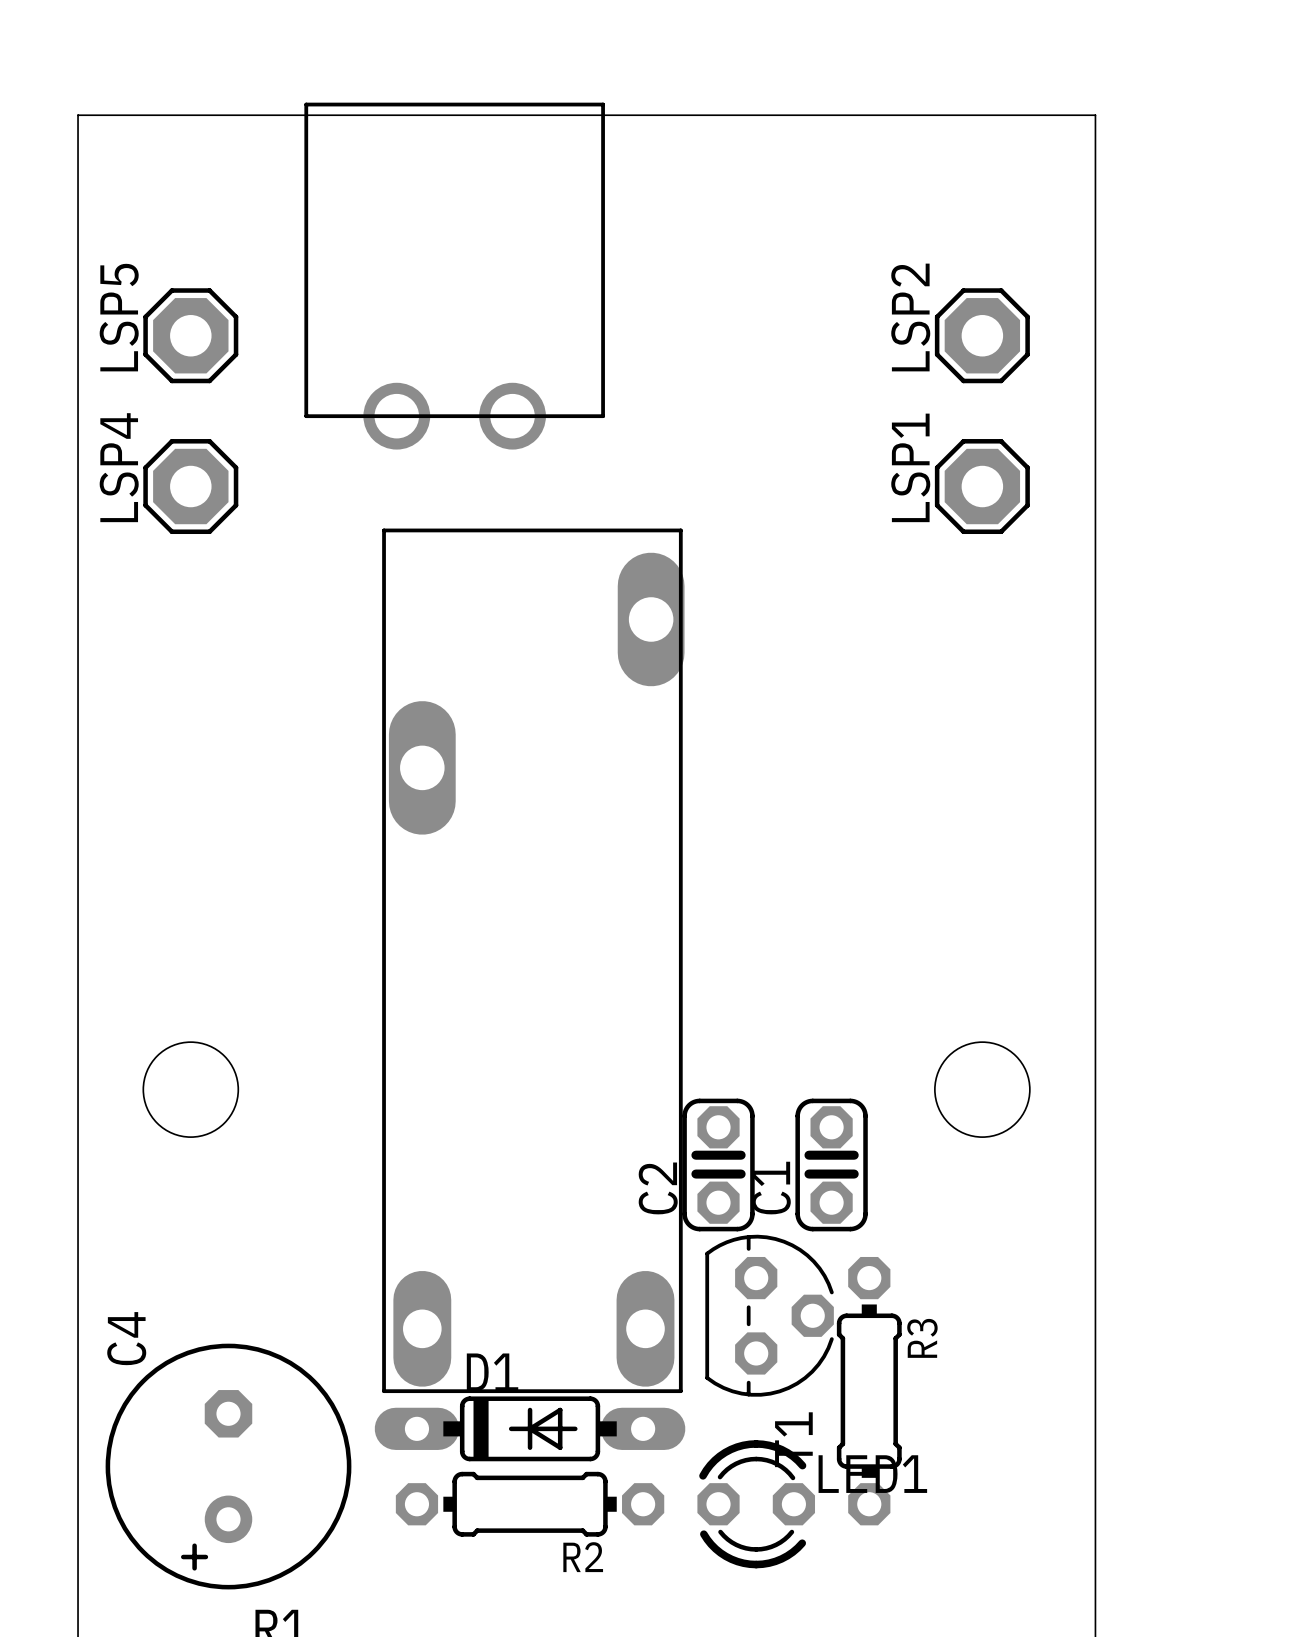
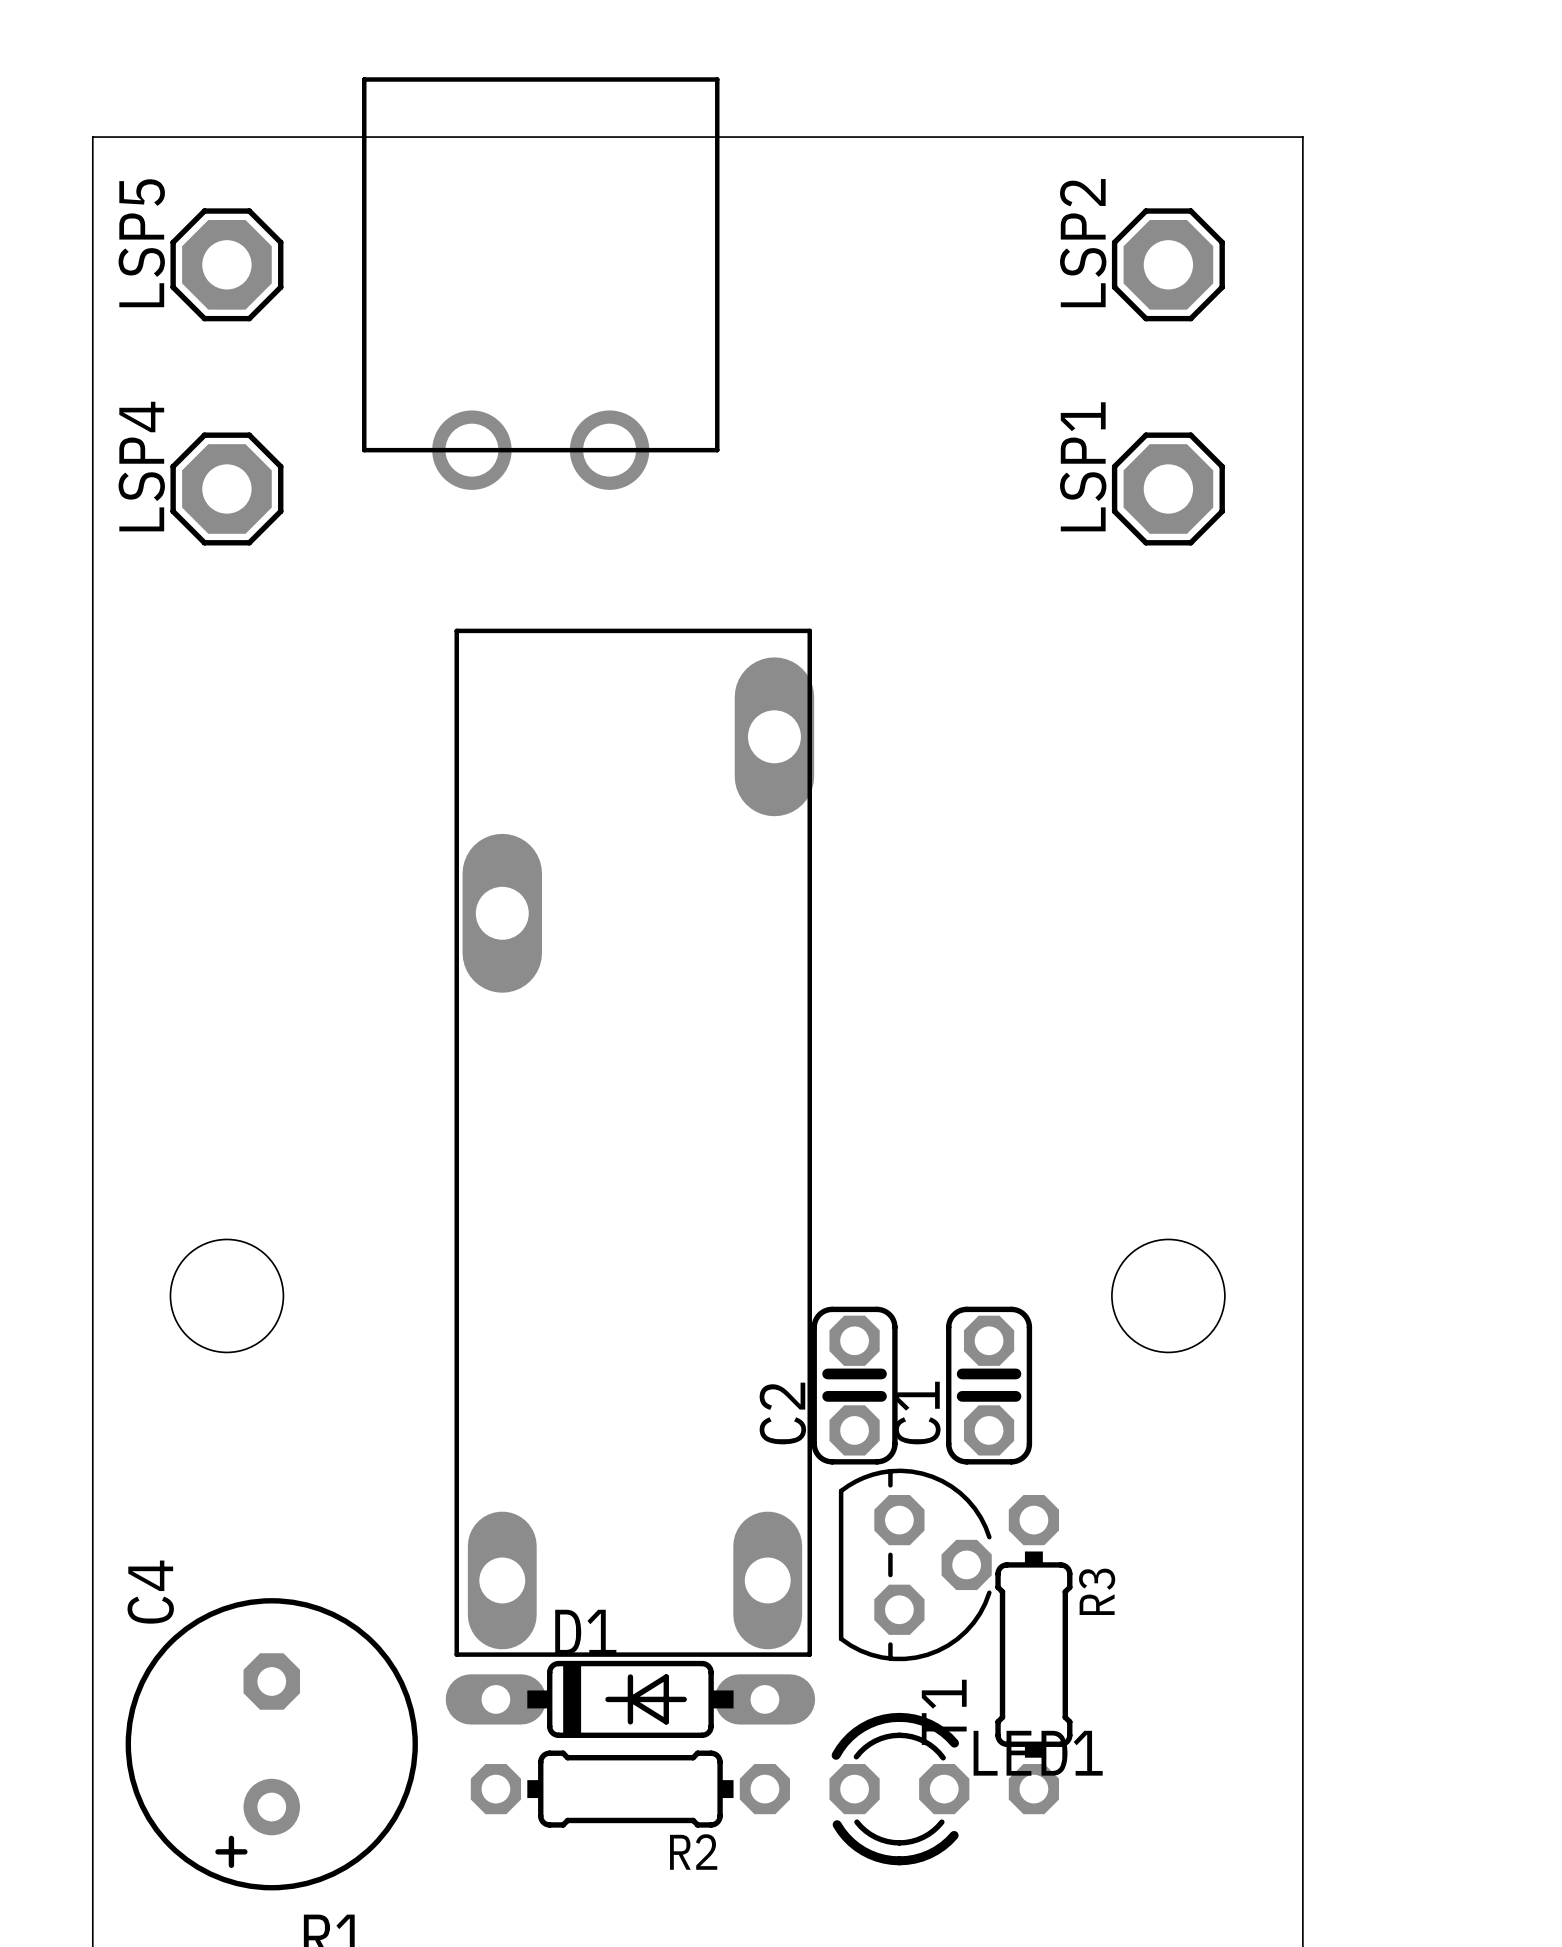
part position: (454, 276) -> (540, 283)
LSP5 position: (190, 335) -> (226, 264)
LSP2 position: (982, 335) -> (1168, 264)
LSP4 position: (190, 486) -> (226, 488)
LSP1 position: (982, 486) -> (1168, 488)

